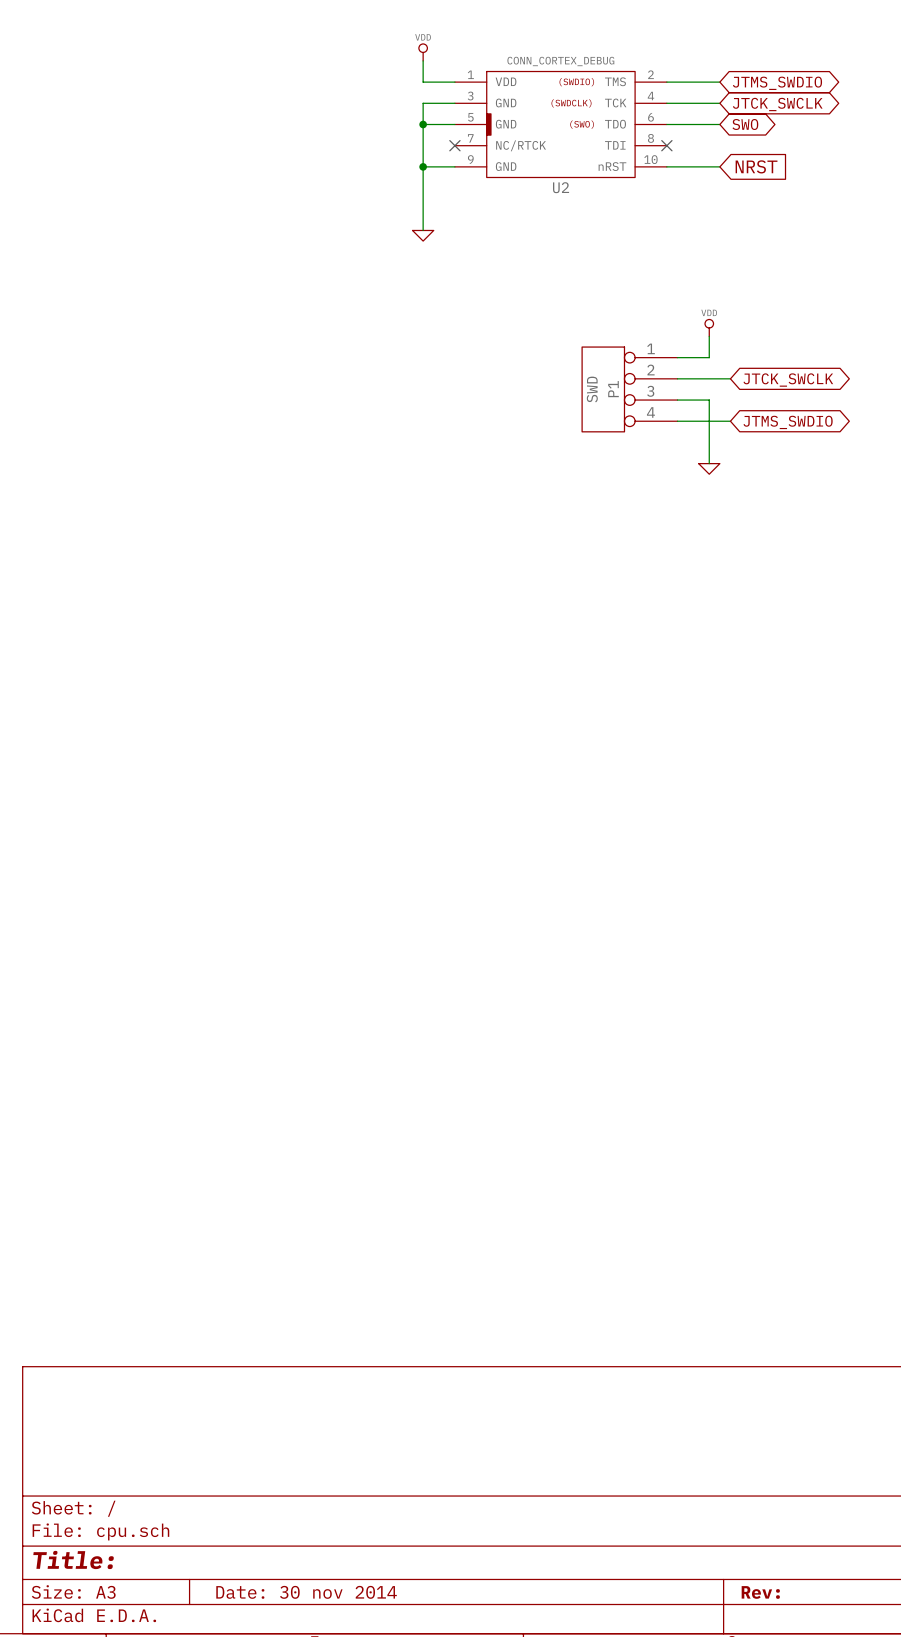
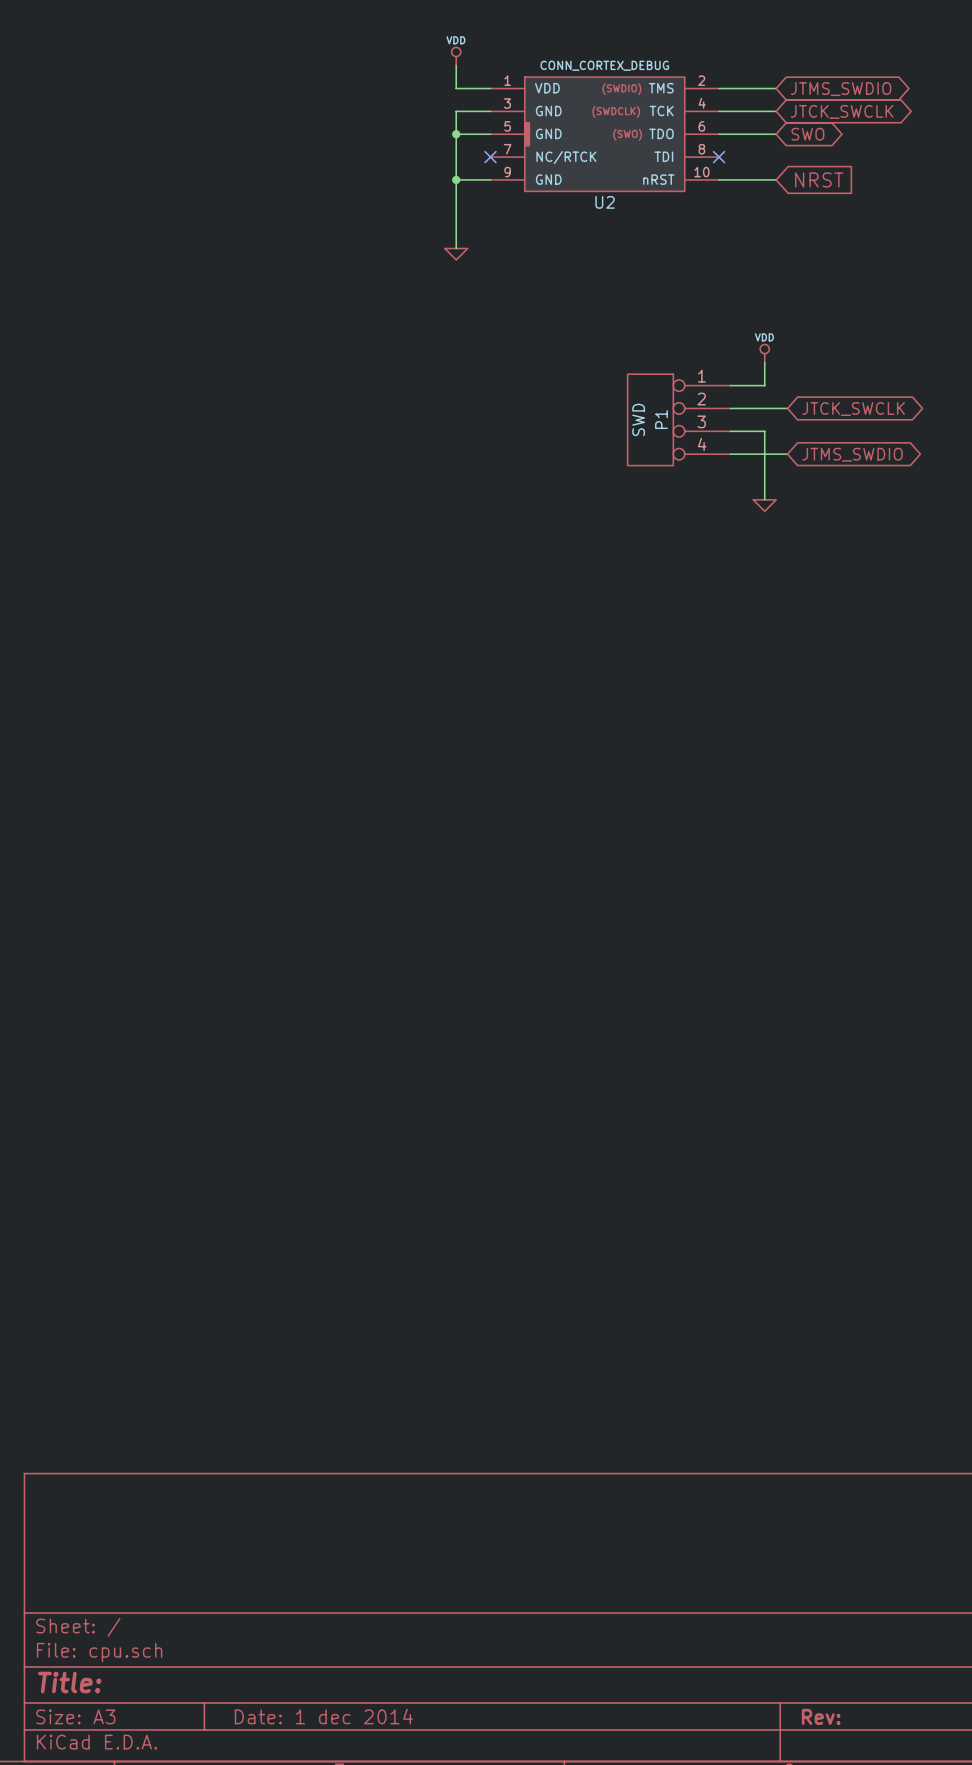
title block: Date: 30 nov 2014 (306, 1592) -> Date: 1 dec 2014 (323, 1716)

